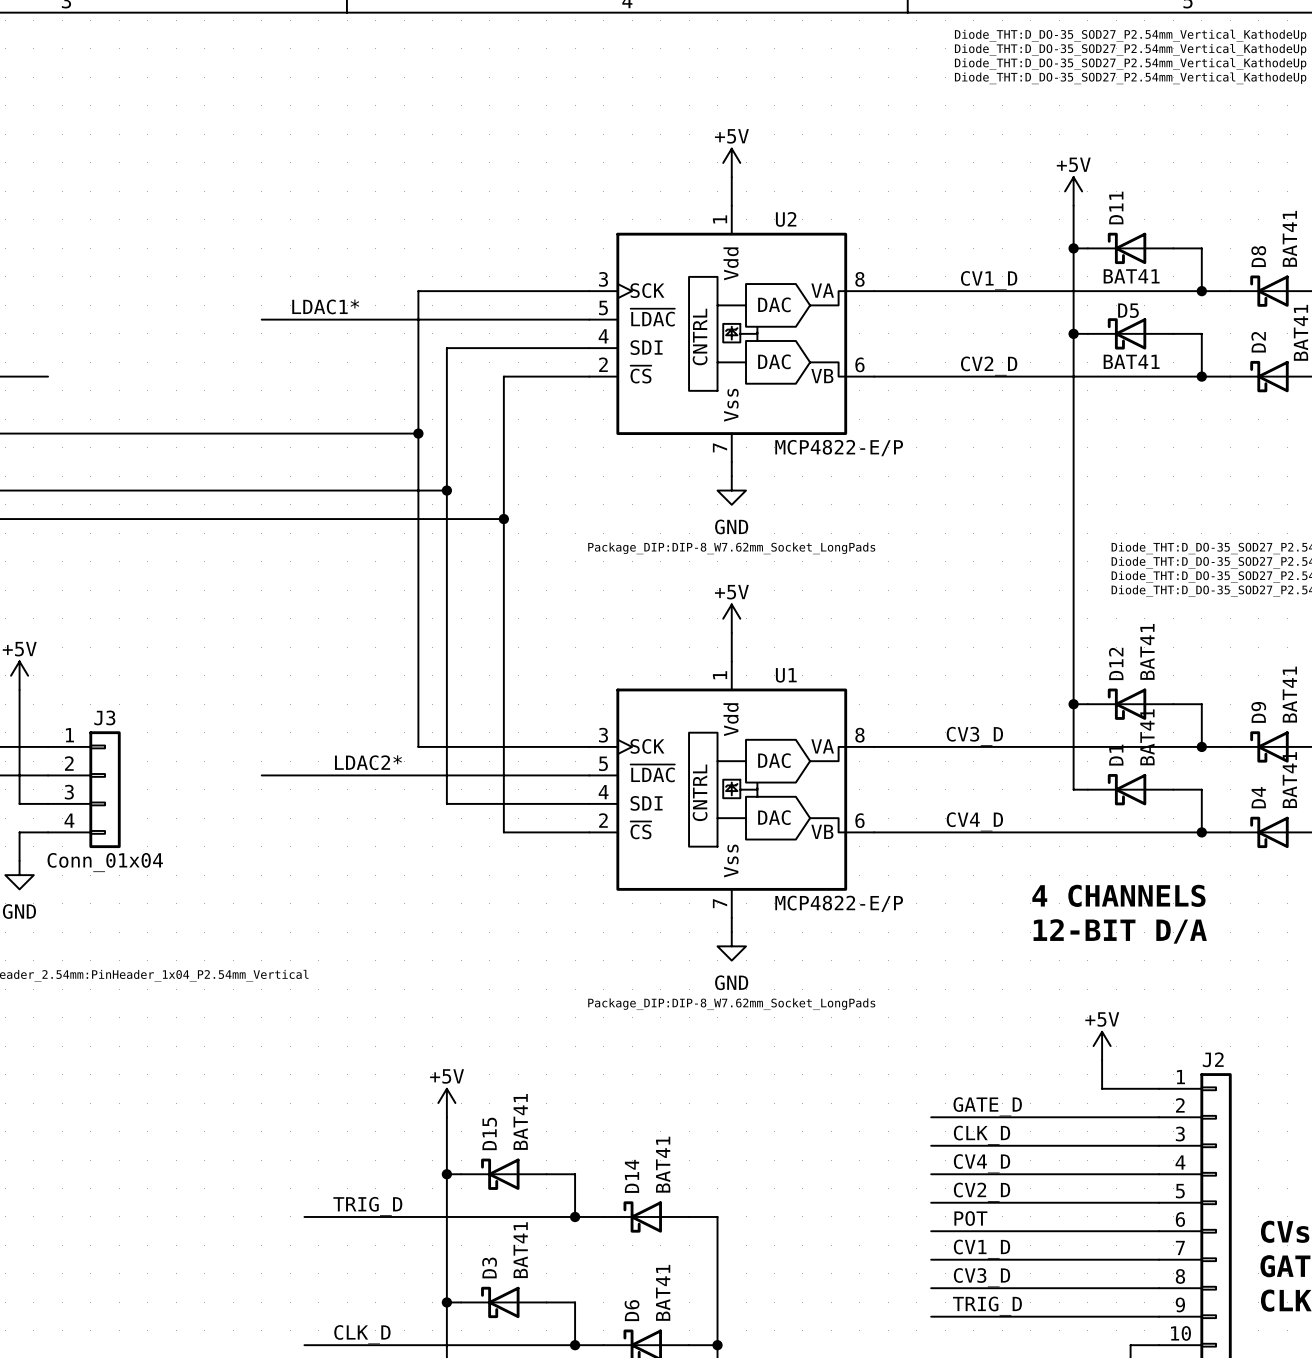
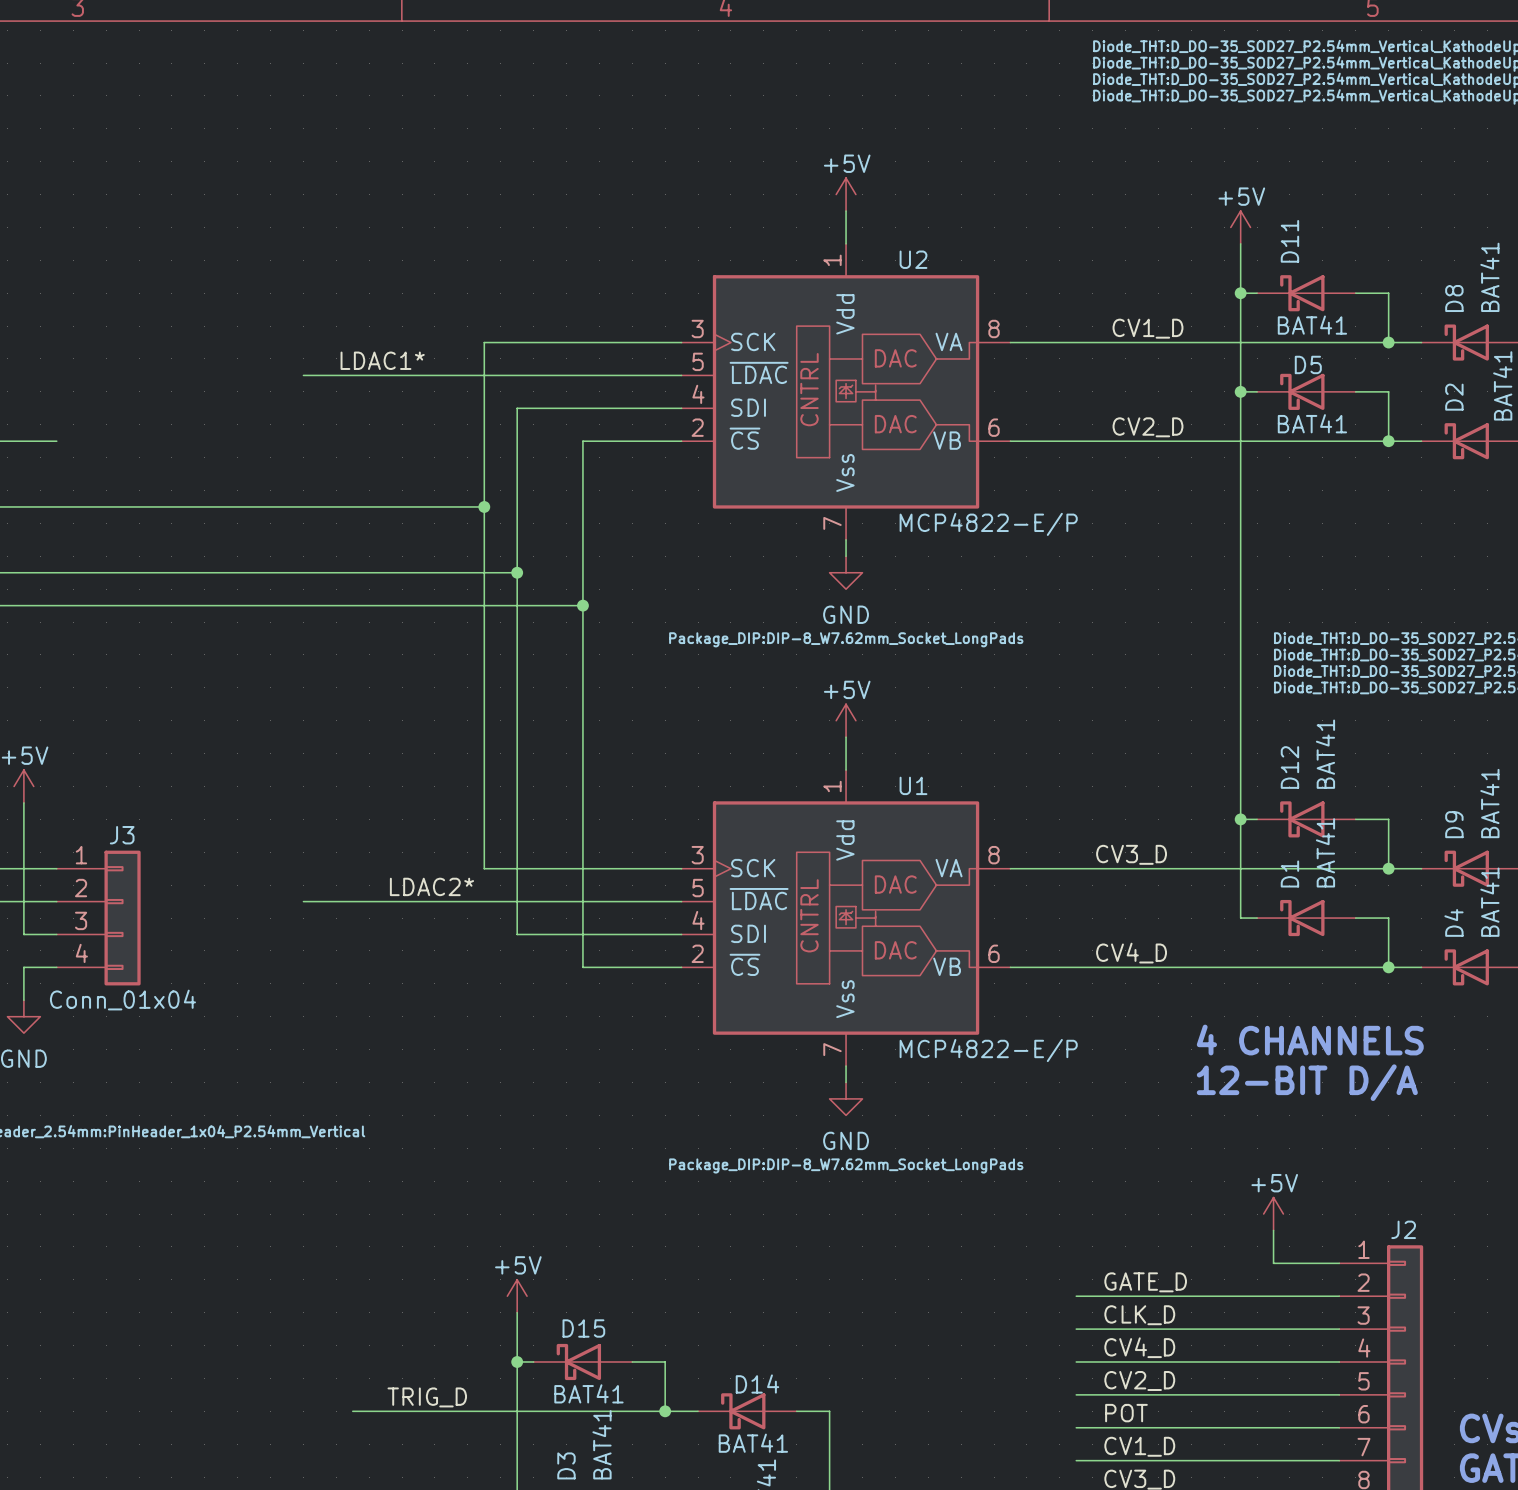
power symbol position: +5V (446, 1103) -> +5V (517, 1296)
D15 value rotation: 0° (520, 1121) -> 90° clockwise (588, 1393)
D15 value position: BAT41 (520, 1121) -> BAT41 (588, 1393)
D15 name rotation: 0° (489, 1133) -> 90° clockwise (583, 1328)
D14 value rotation: 0° (663, 1164) -> 90° clockwise (753, 1443)
D14 value position: BAT41 (663, 1164) -> BAT41 (753, 1443)
D14 name rotation: 0° (632, 1176) -> 90° clockwise (757, 1384)

